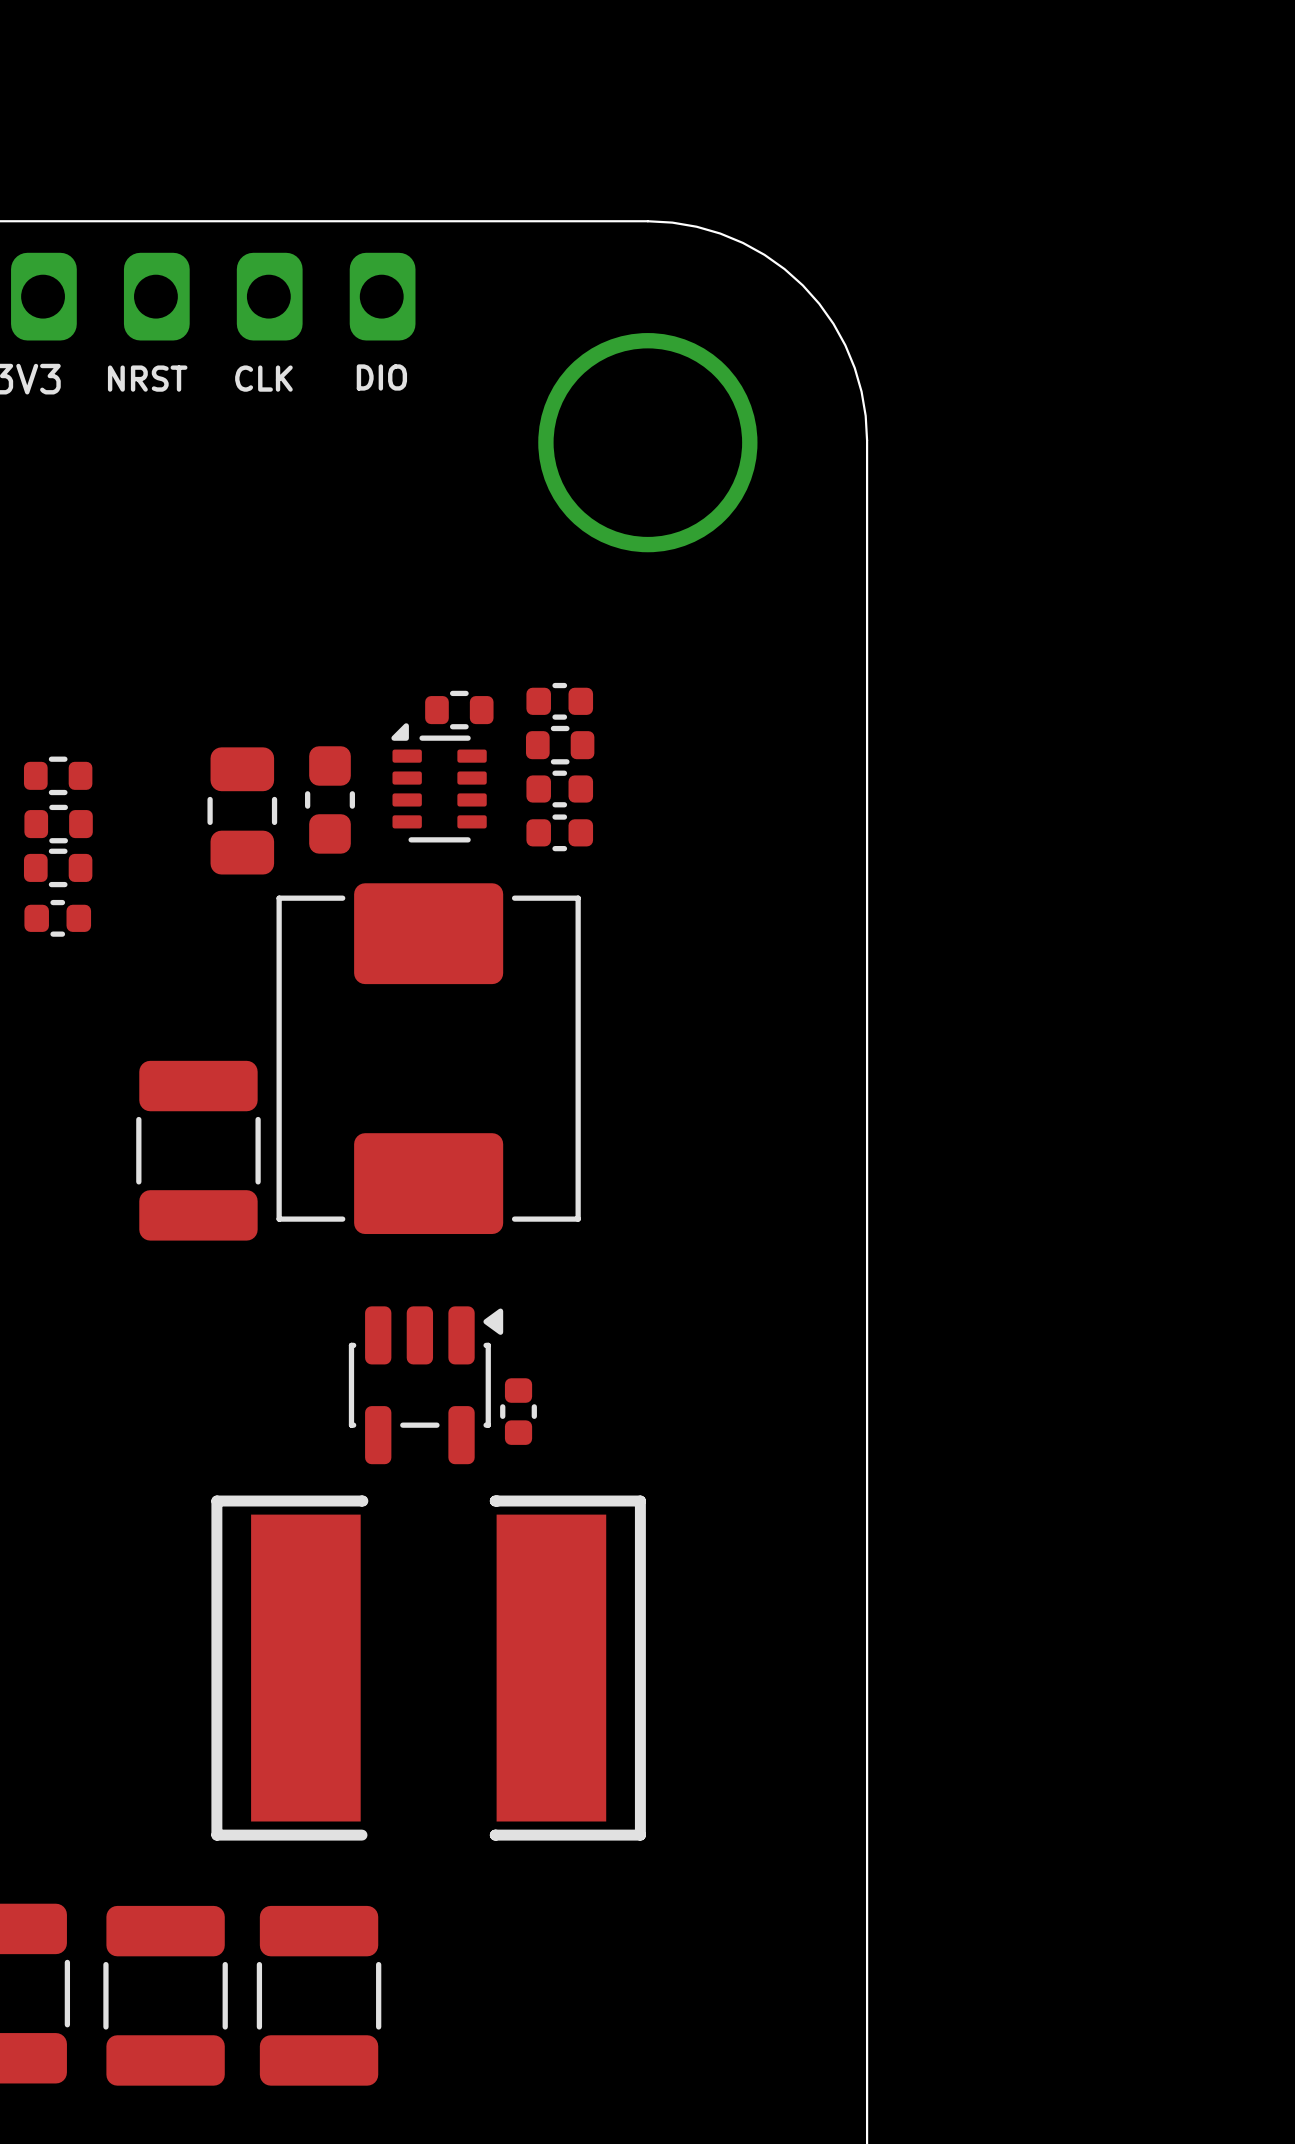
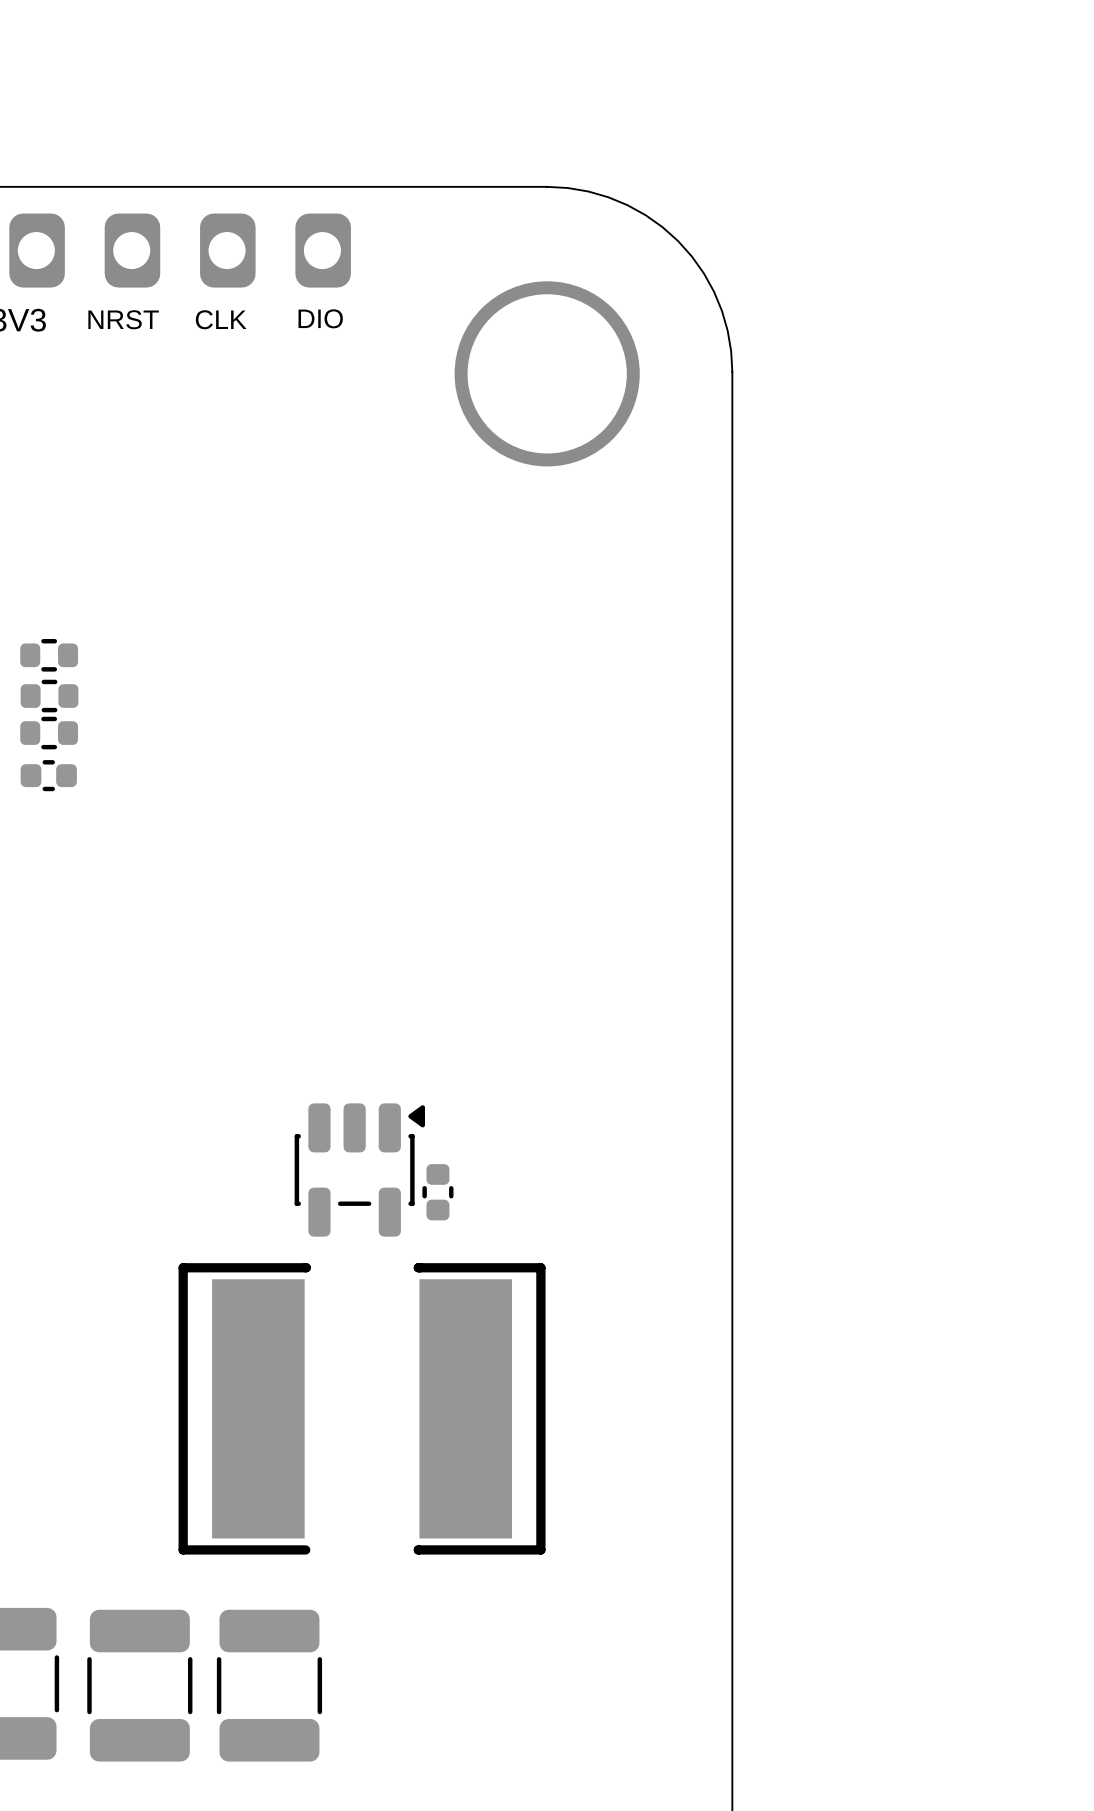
part: (559, 701) -> none
part: (459, 710) -> none
part: (560, 745) -> none
part: (439, 782) -> none
part: (559, 789) -> none
part: (330, 799) -> none
part: (242, 810) -> none
part: (559, 832) -> none
part: (428, 1058) -> none
part: (198, 1150) -> none

